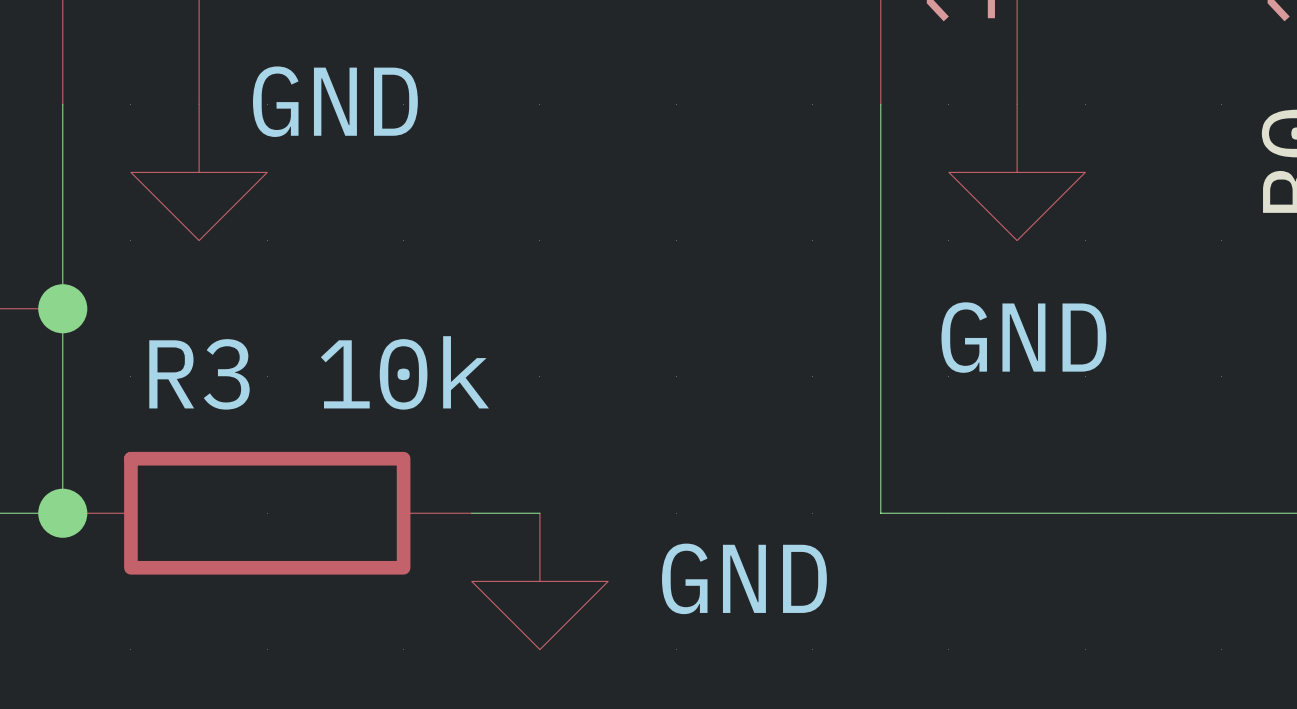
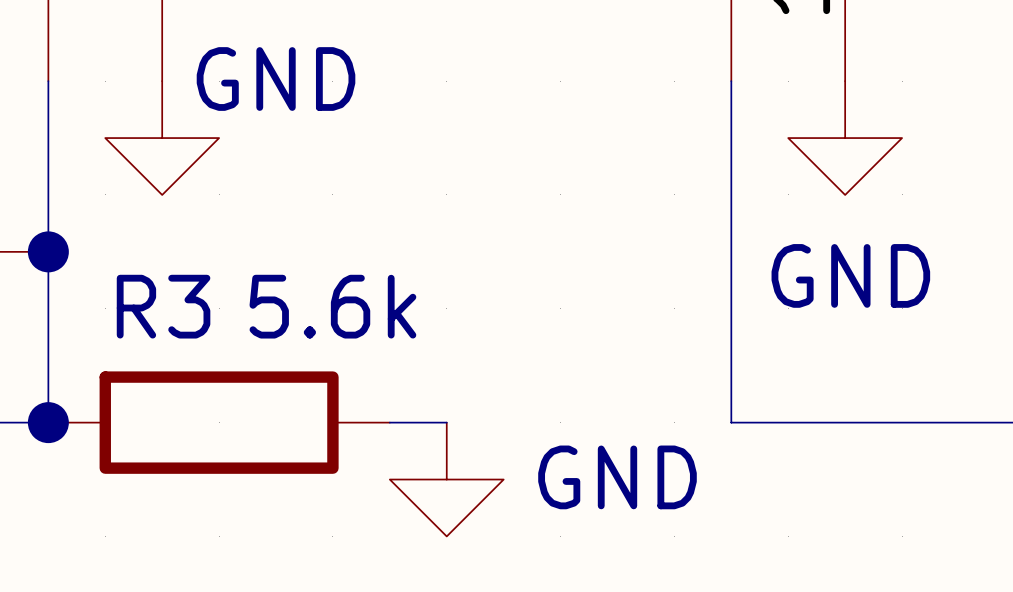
R3 value: 10k (404, 372) -> 5.6k (332, 306)

